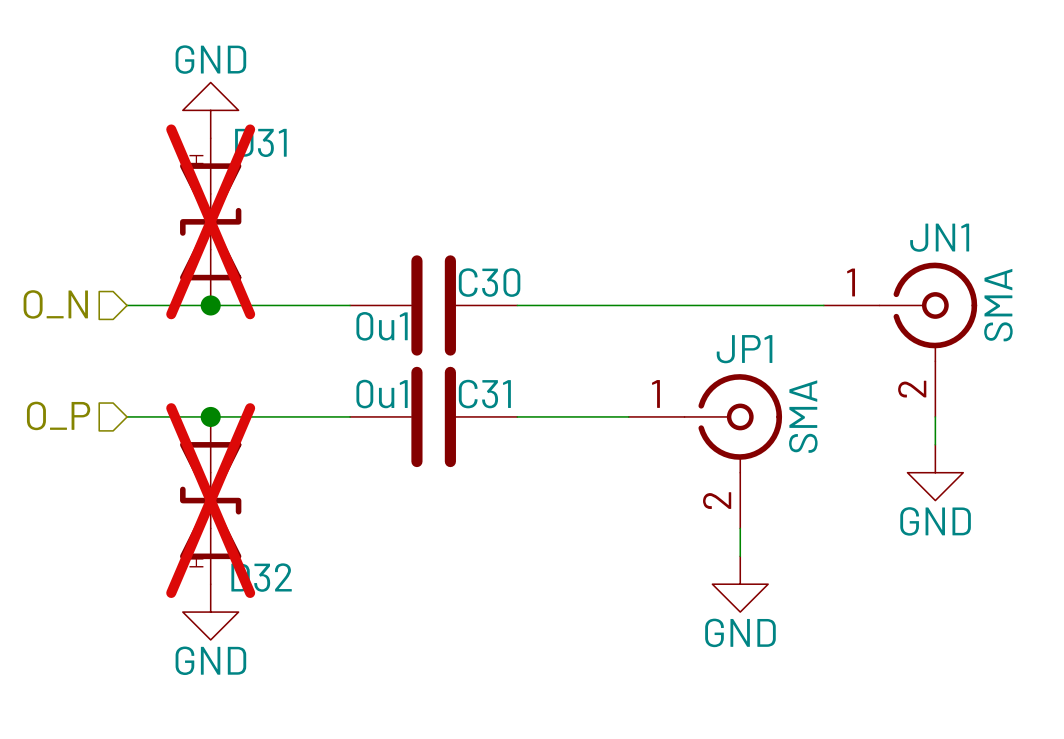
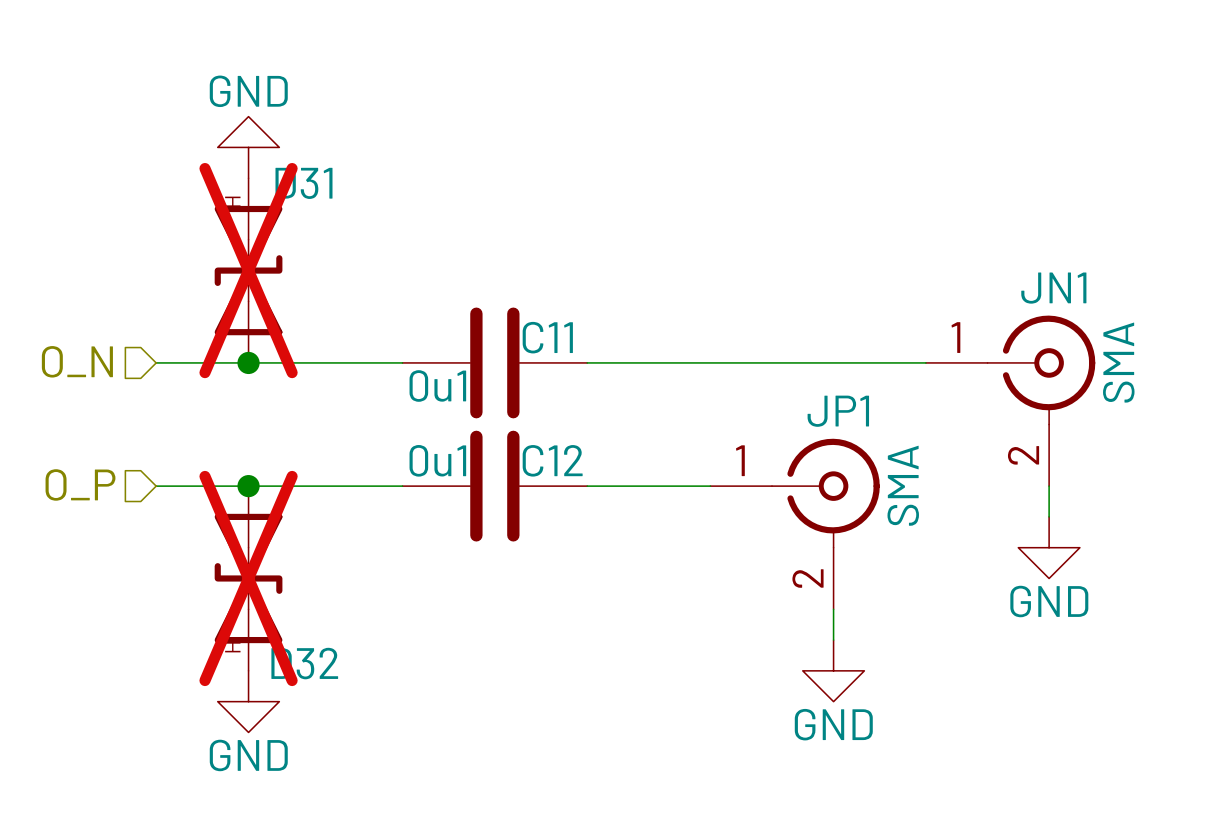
C30 name: C30 (489, 282) -> C11 (547, 337)
C31 name: C31 (484, 394) -> C12 (552, 460)

